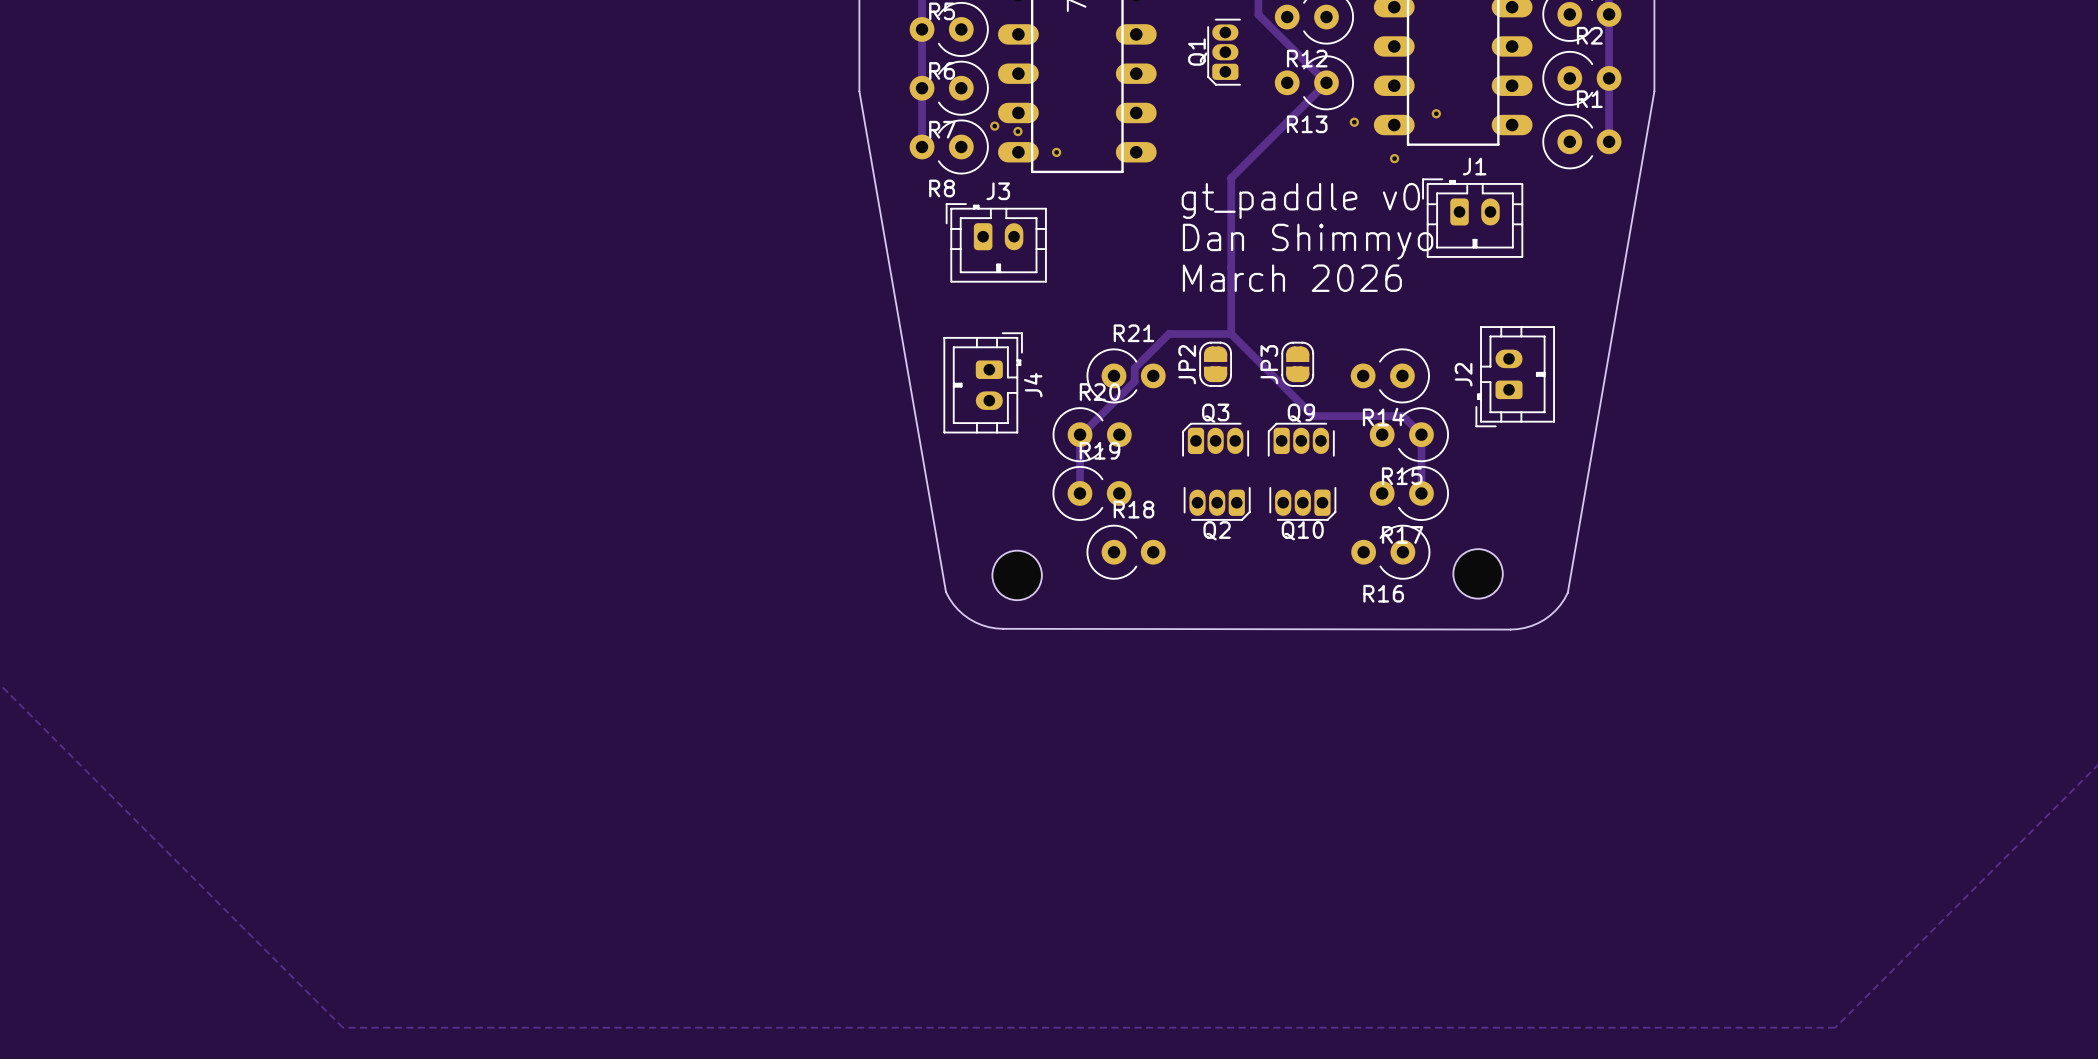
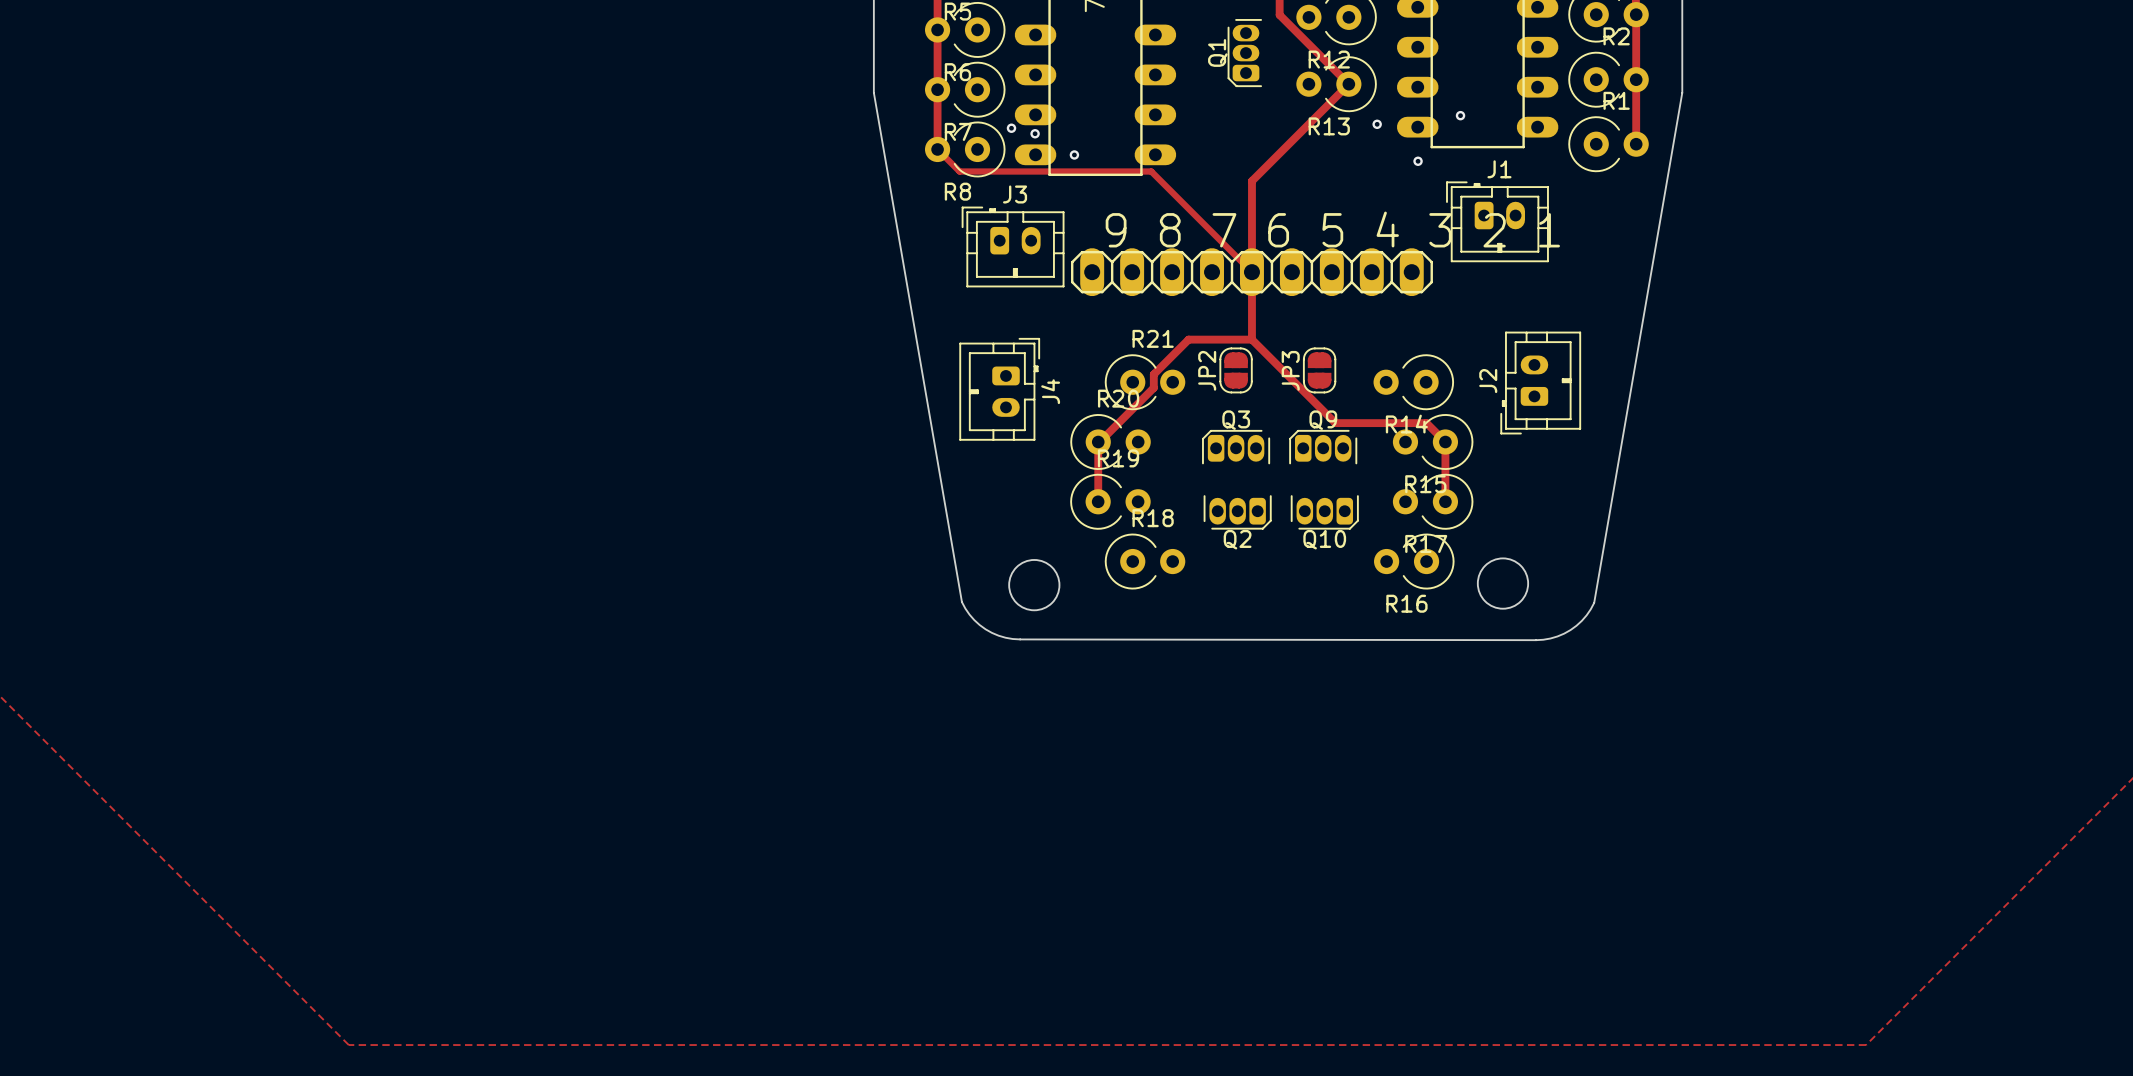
track: none -> (937, 149) (959, 171) (1151, 171) (1251, 272)
text: gt_paddle v0 (1300, 200) -> none
text: none -> 9 8 7 6 5 4 3 2 1 (1332, 229)
text: Dan Shimmyo (1308, 241) -> none
part: none -> (1251, 272)
text: March 2026 (1292, 278) -> none

